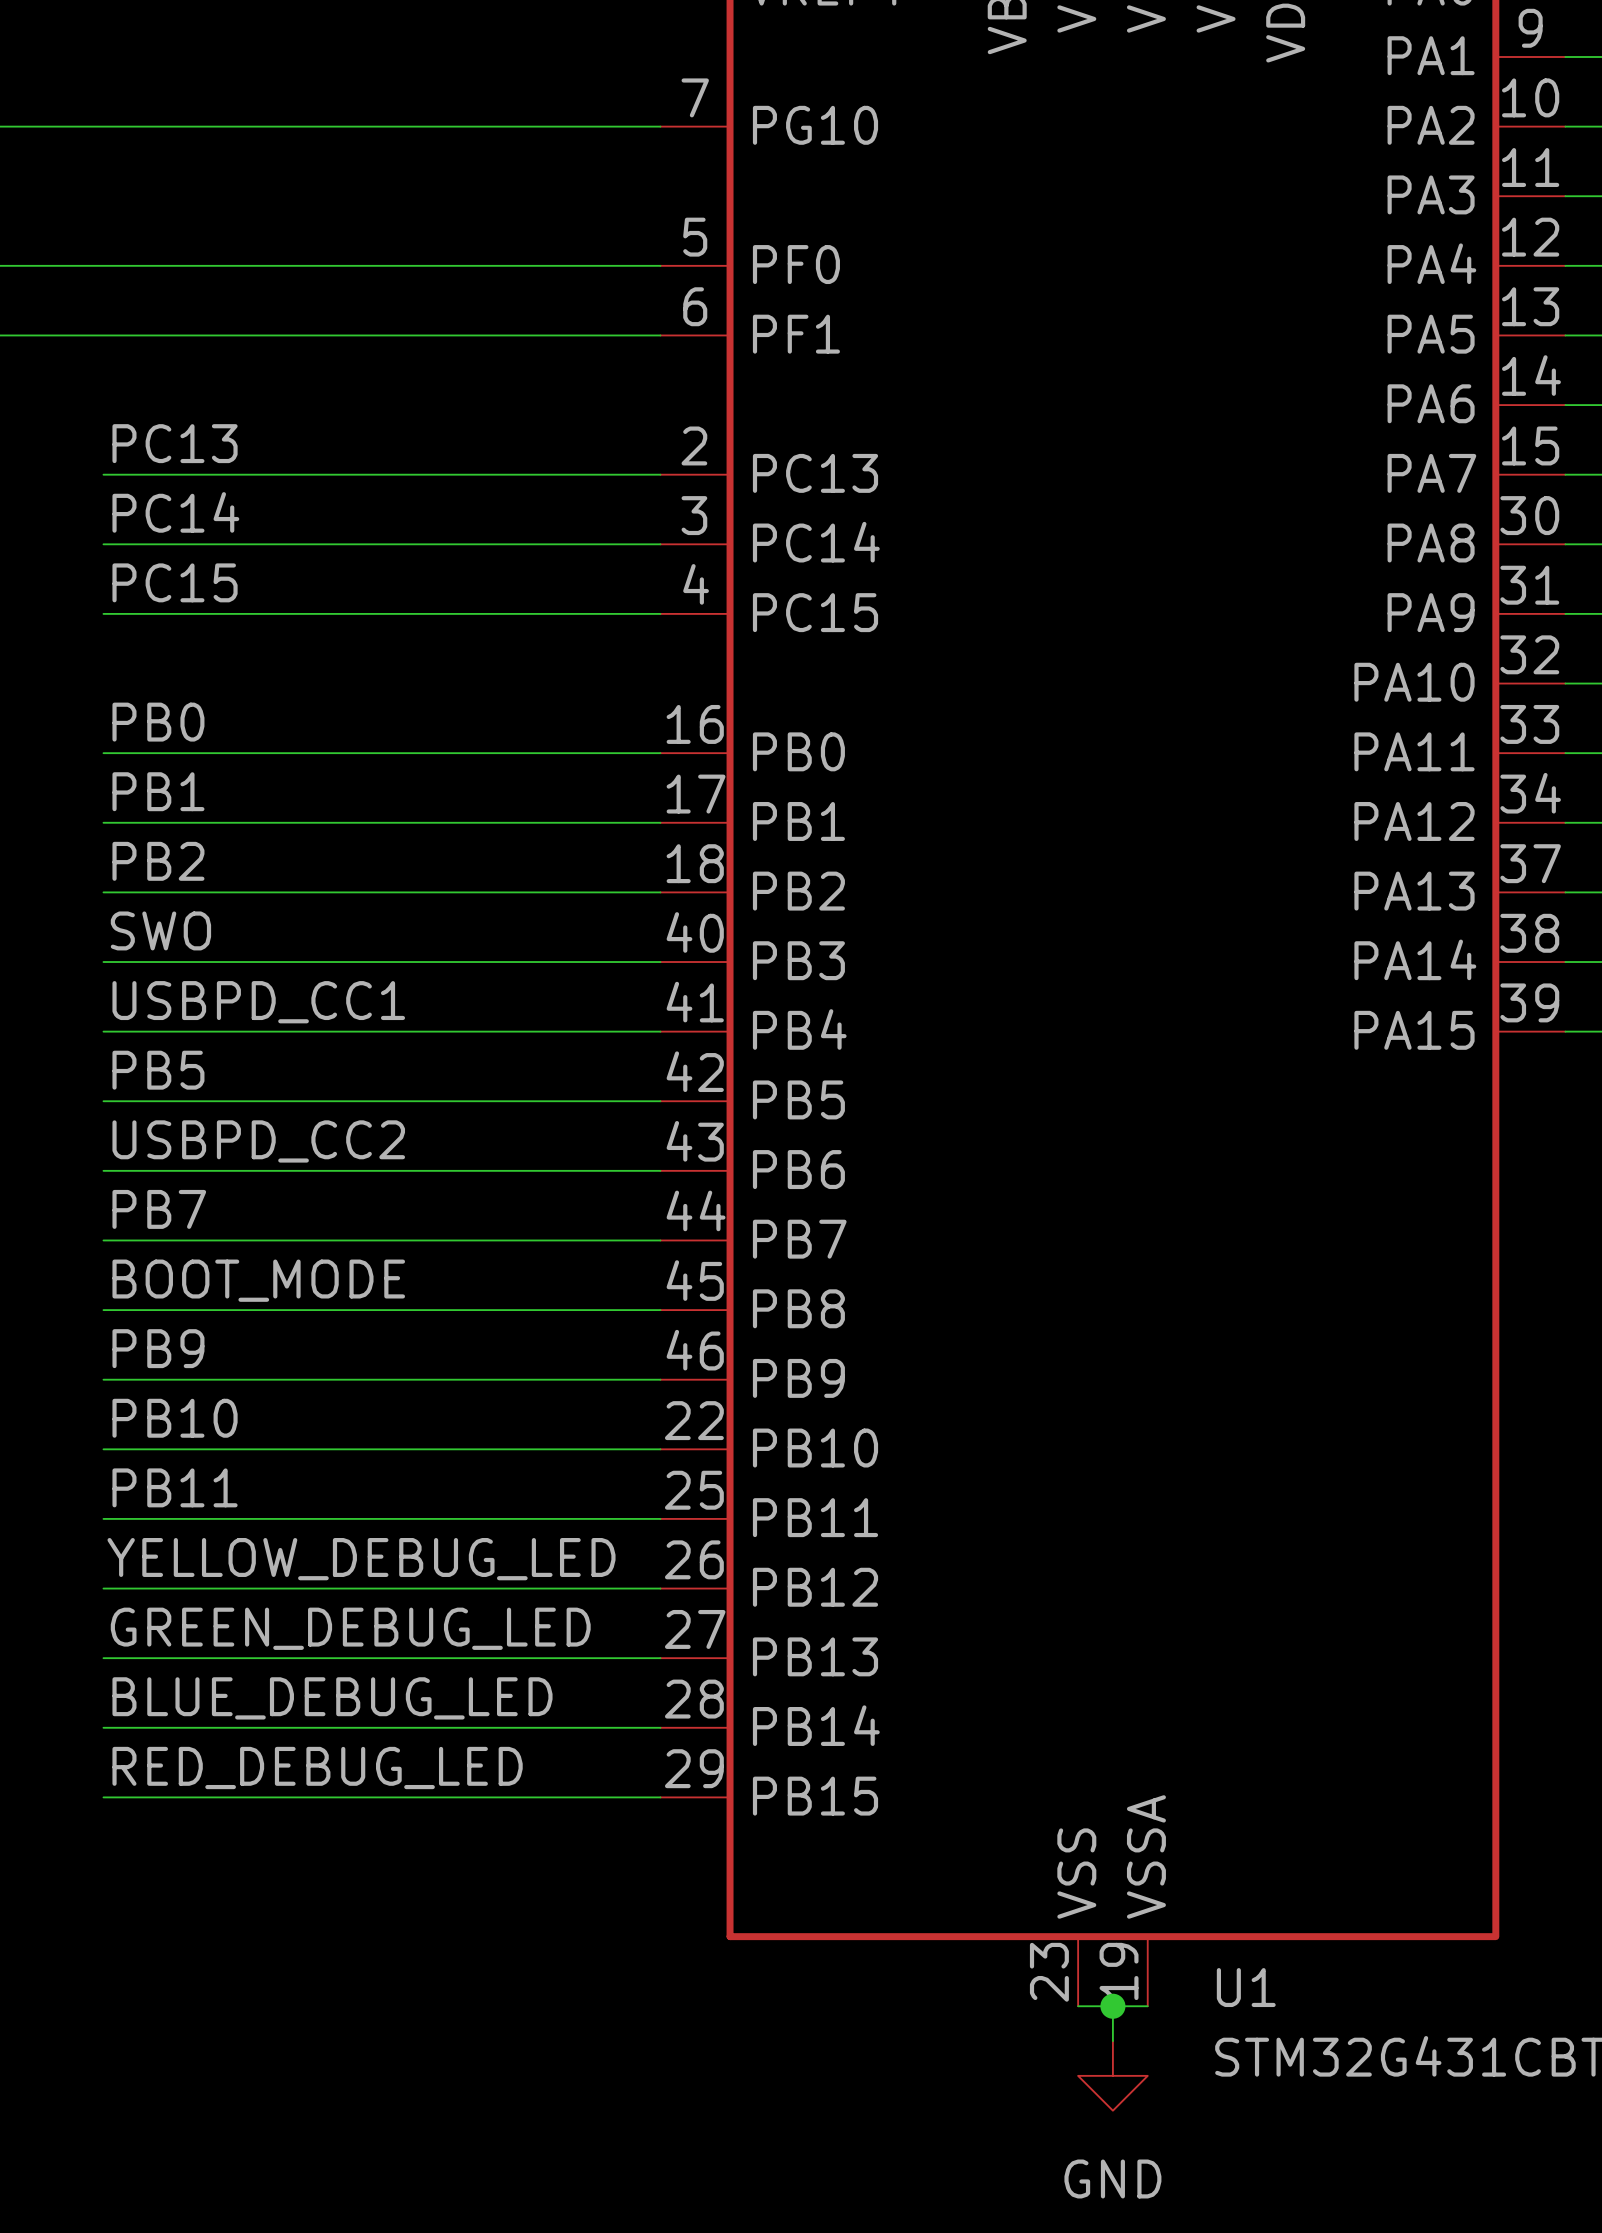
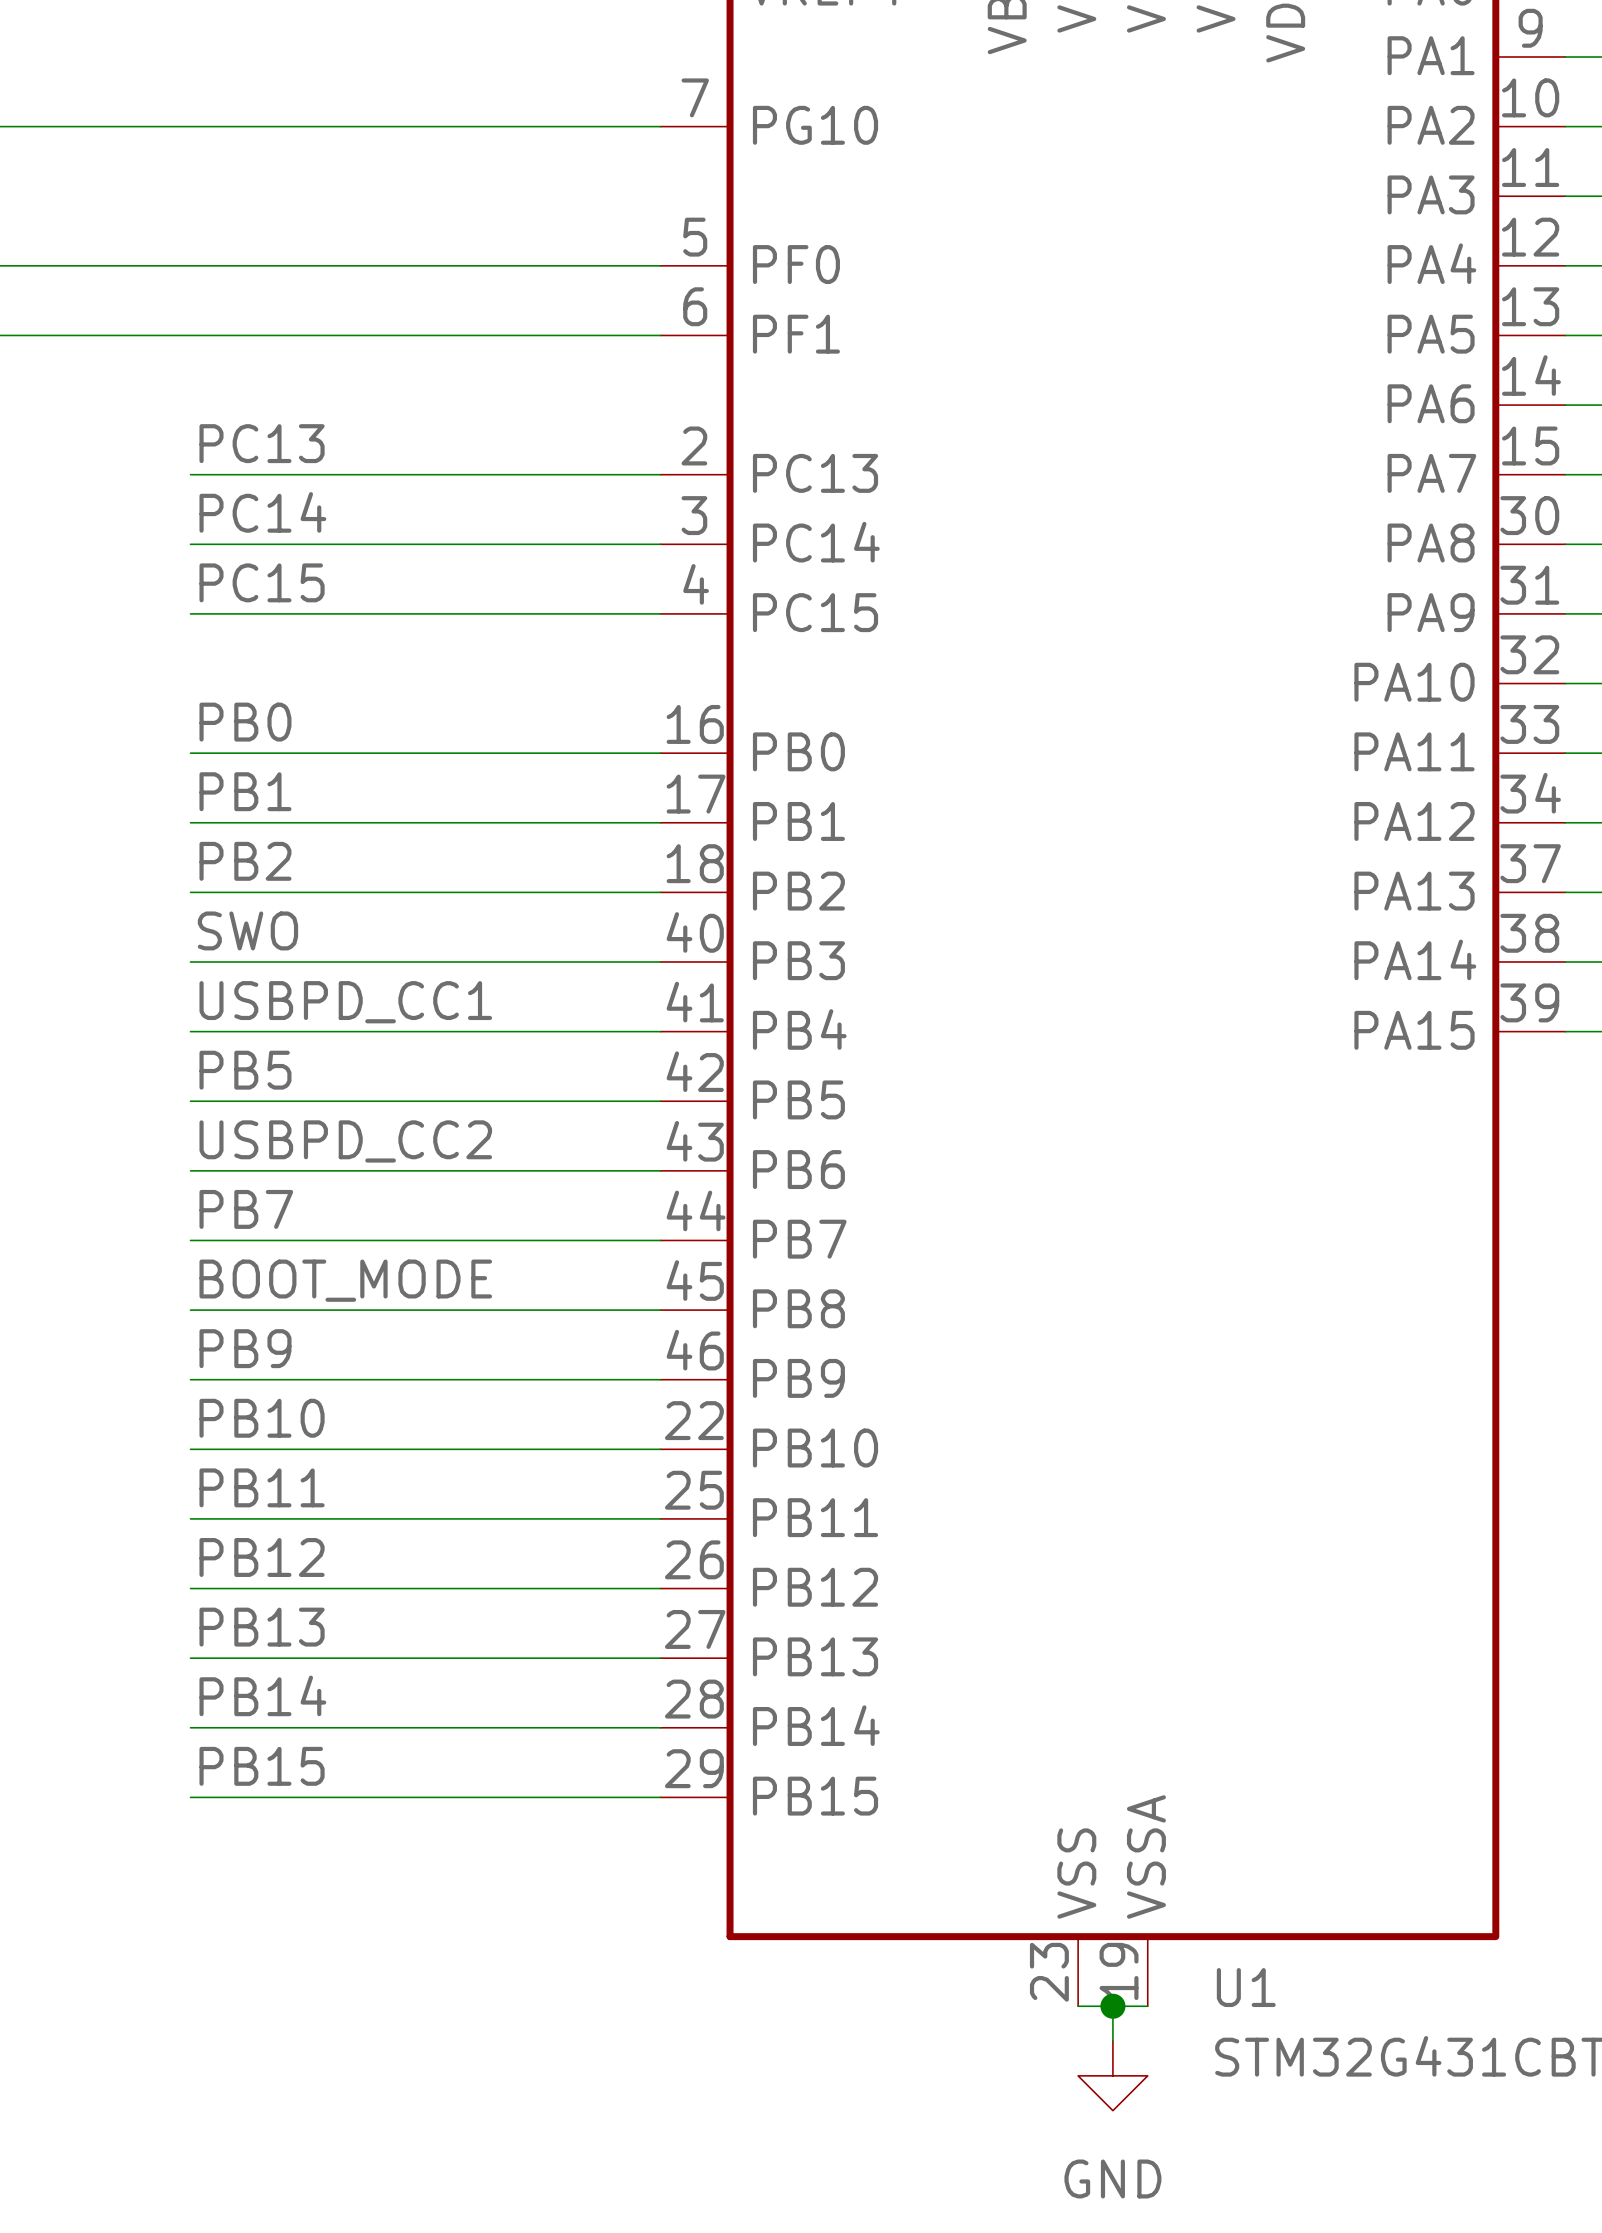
label position: PC13 (175, 443) -> PC13 (262, 443)
wire: (103, 474) (190, 474) -> none
label position: PC14 (175, 512) -> PC14 (262, 512)
wire: (103, 544) (190, 544) -> none
label position: PC15 (175, 582) -> PC15 (262, 582)
wire: (103, 613) (190, 613) -> none
label position: PB0 (158, 722) -> PB0 (245, 722)
wire: (103, 753) (190, 753) -> none
label position: PB1 (158, 791) -> PB1 (245, 791)
wire: (103, 822) (190, 822) -> none
label position: PB2 (158, 861) -> PB2 (245, 861)
wire: (103, 892) (190, 892) -> none
label position: SWO (160, 930) -> SWO (247, 930)
wire: (103, 962) (190, 962) -> none
label position: USBPD_CC1 (258, 1002) -> USBPD_CC1 (345, 1002)
wire: (103, 1031) (190, 1031) -> none
label position: PB5 (158, 1070) -> PB5 (245, 1070)
wire: (103, 1101) (190, 1101) -> none
label position: USBPD_CC2 (258, 1141) -> USBPD_CC2 (345, 1141)
wire: (103, 1170) (190, 1170) -> none
label position: PB7 (159, 1209) -> PB7 (246, 1209)
wire: (103, 1240) (190, 1240) -> none
label position: BOOT_MODE (258, 1280) -> BOOT_MODE (345, 1280)
wire: (103, 1310) (190, 1310) -> none
label position: PB9 (158, 1348) -> PB9 (245, 1348)
wire: (103, 1379) (190, 1379) -> none
label position: PB10 (175, 1418) -> PB10 (262, 1418)
wire: (103, 1449) (190, 1449) -> none
label position: PB11 (175, 1487) -> PB11 (262, 1487)
wire: (103, 1518) (190, 1518) -> none
label: none -> PB12 (262, 1557)
label: YELLOW_DEBUG_LED (361, 1559) -> none
wire: (103, 1588) (190, 1588) -> none
label: none -> PB13 (262, 1627)
label: GREEN_DEBUG_LED (350, 1628) -> none
wire: (103, 1658) (190, 1658) -> none
label: none -> PB14 (262, 1695)
label: BLUE_DEBUG_LED (332, 1698) -> none
wire: (103, 1727) (190, 1727) -> none
label: none -> PB15 (262, 1766)
label: RED_DEBUG_LED (317, 1767) -> none
wire: (103, 1797) (190, 1797) -> none

